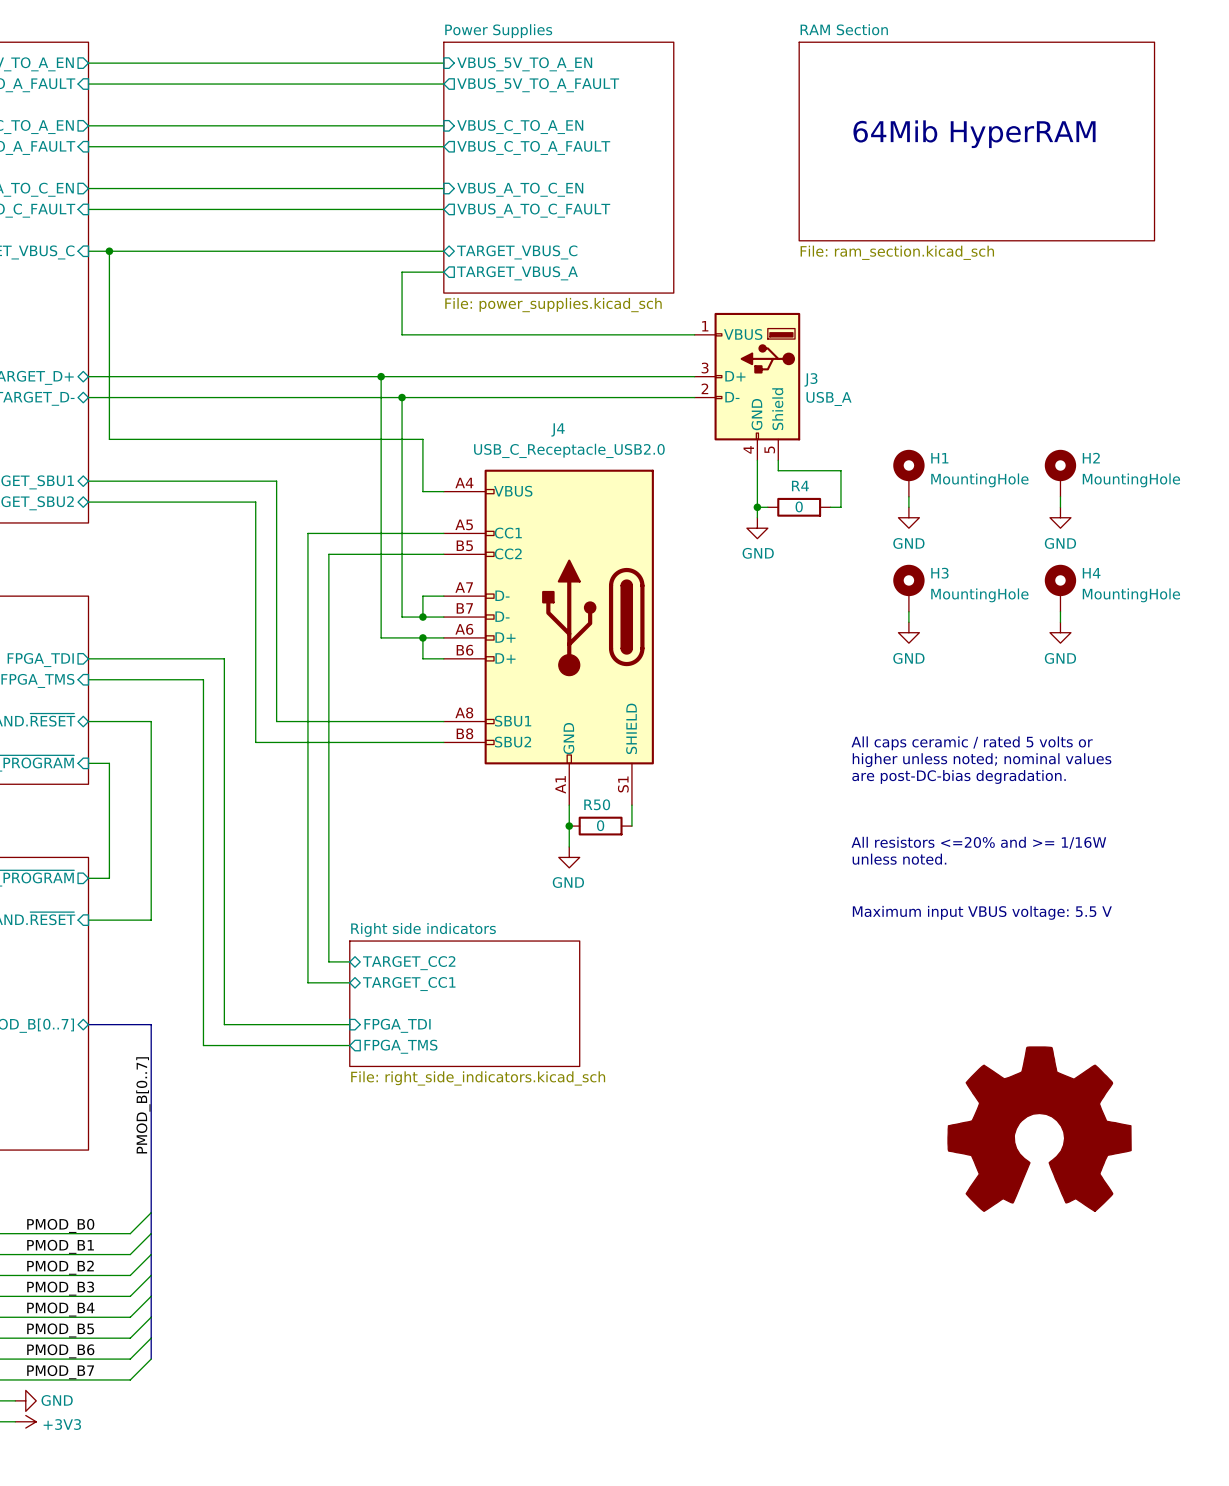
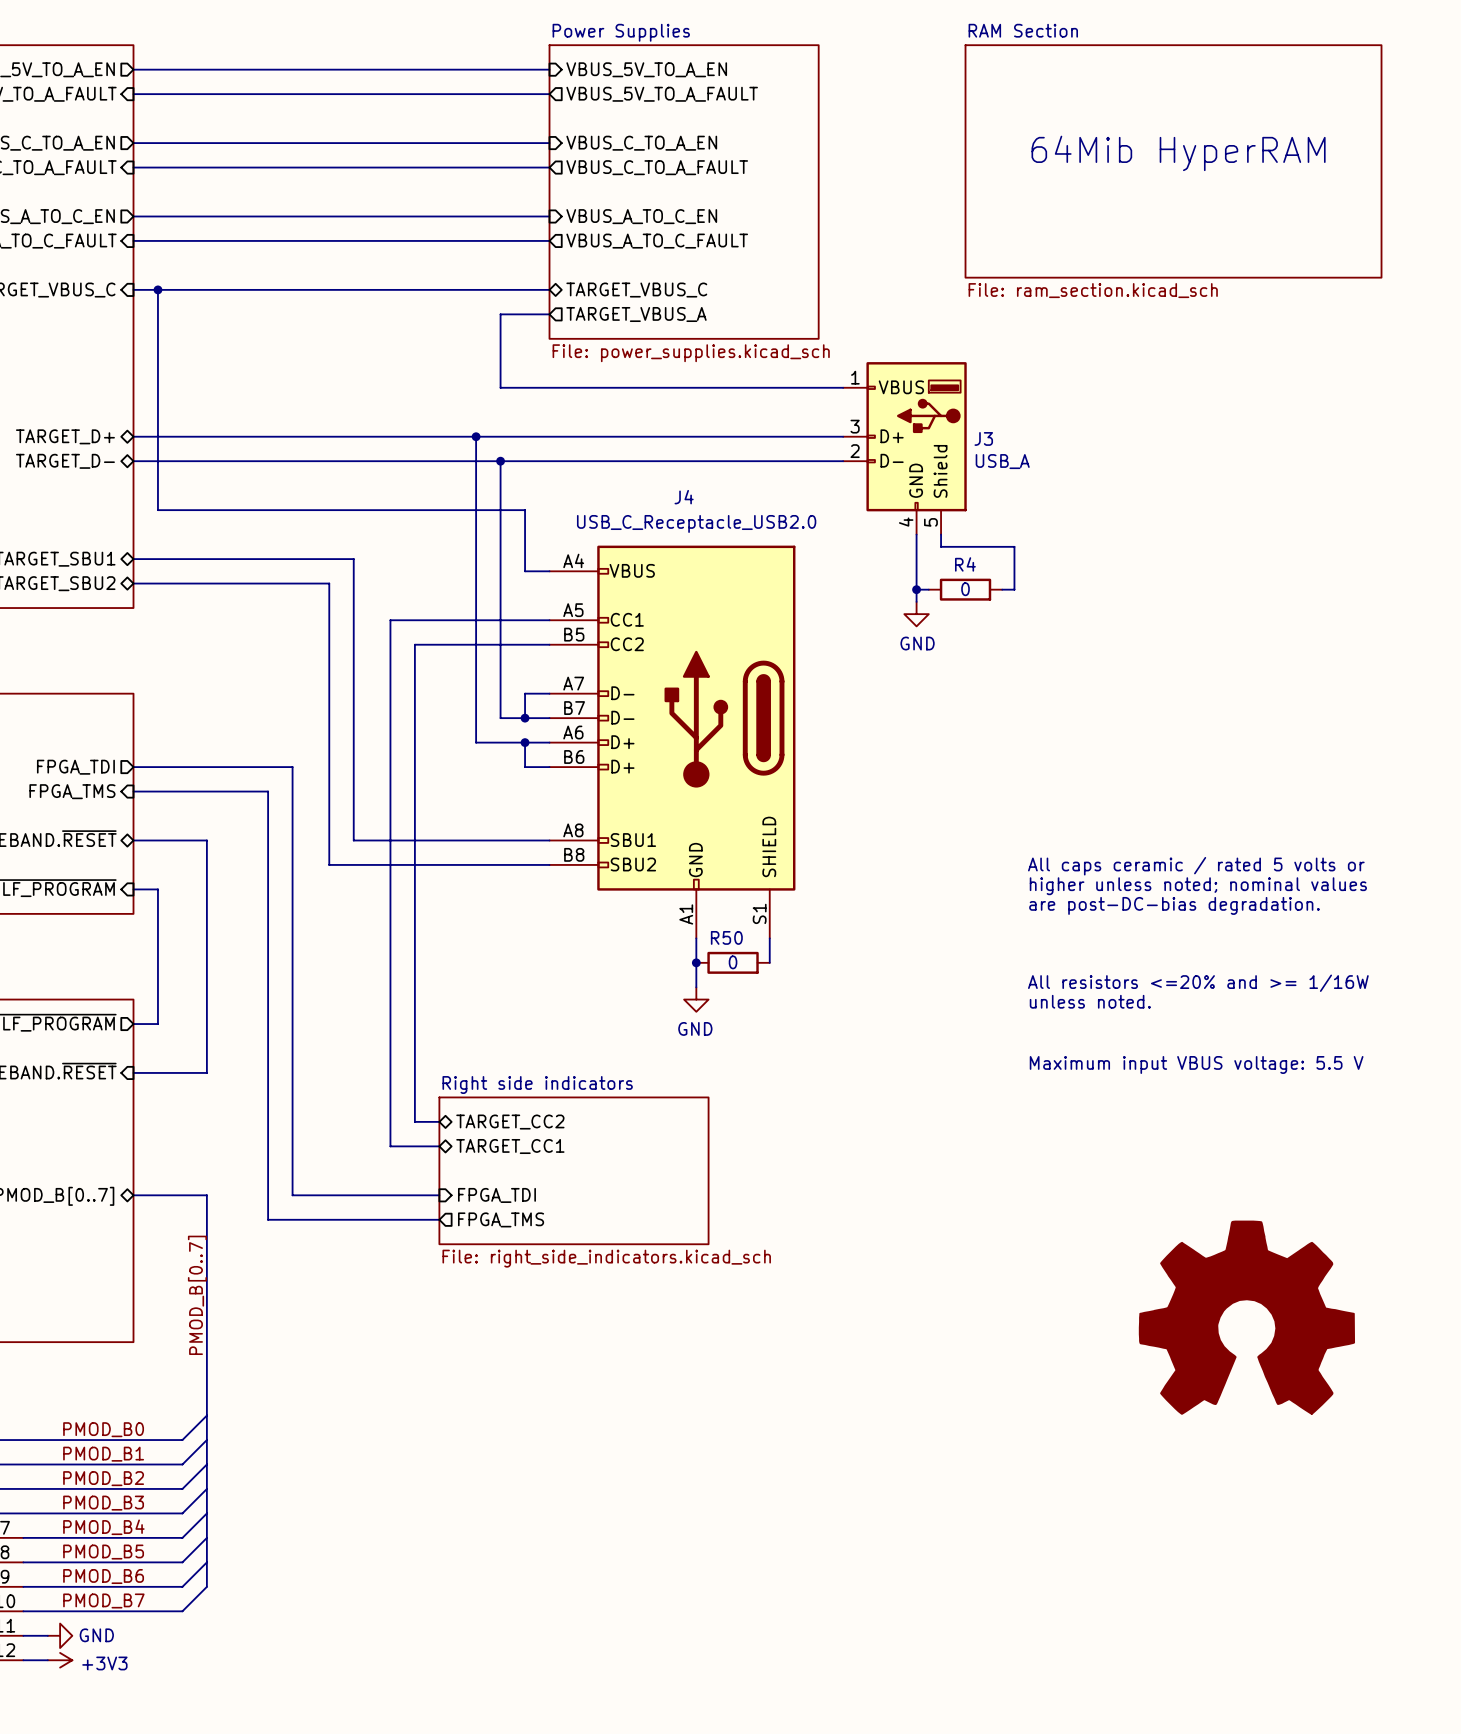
H1: MountingHole (908, 473) -> none
H2: MountingHole (1060, 473) -> none
wire: (908, 496) (908, 507) -> none
wire: (1060, 496) (1060, 507) -> none
power symbol: GND (908, 517) -> none
power symbol: GND (1060, 517) -> none
H3: MountingHole (908, 588) -> none
H4: MountingHole (1060, 588) -> none
wire: (908, 611) (908, 622) -> none
wire: (1060, 611) (1060, 622) -> none
power symbol: GND (908, 632) -> none
power symbol: GND (1060, 632) -> none

